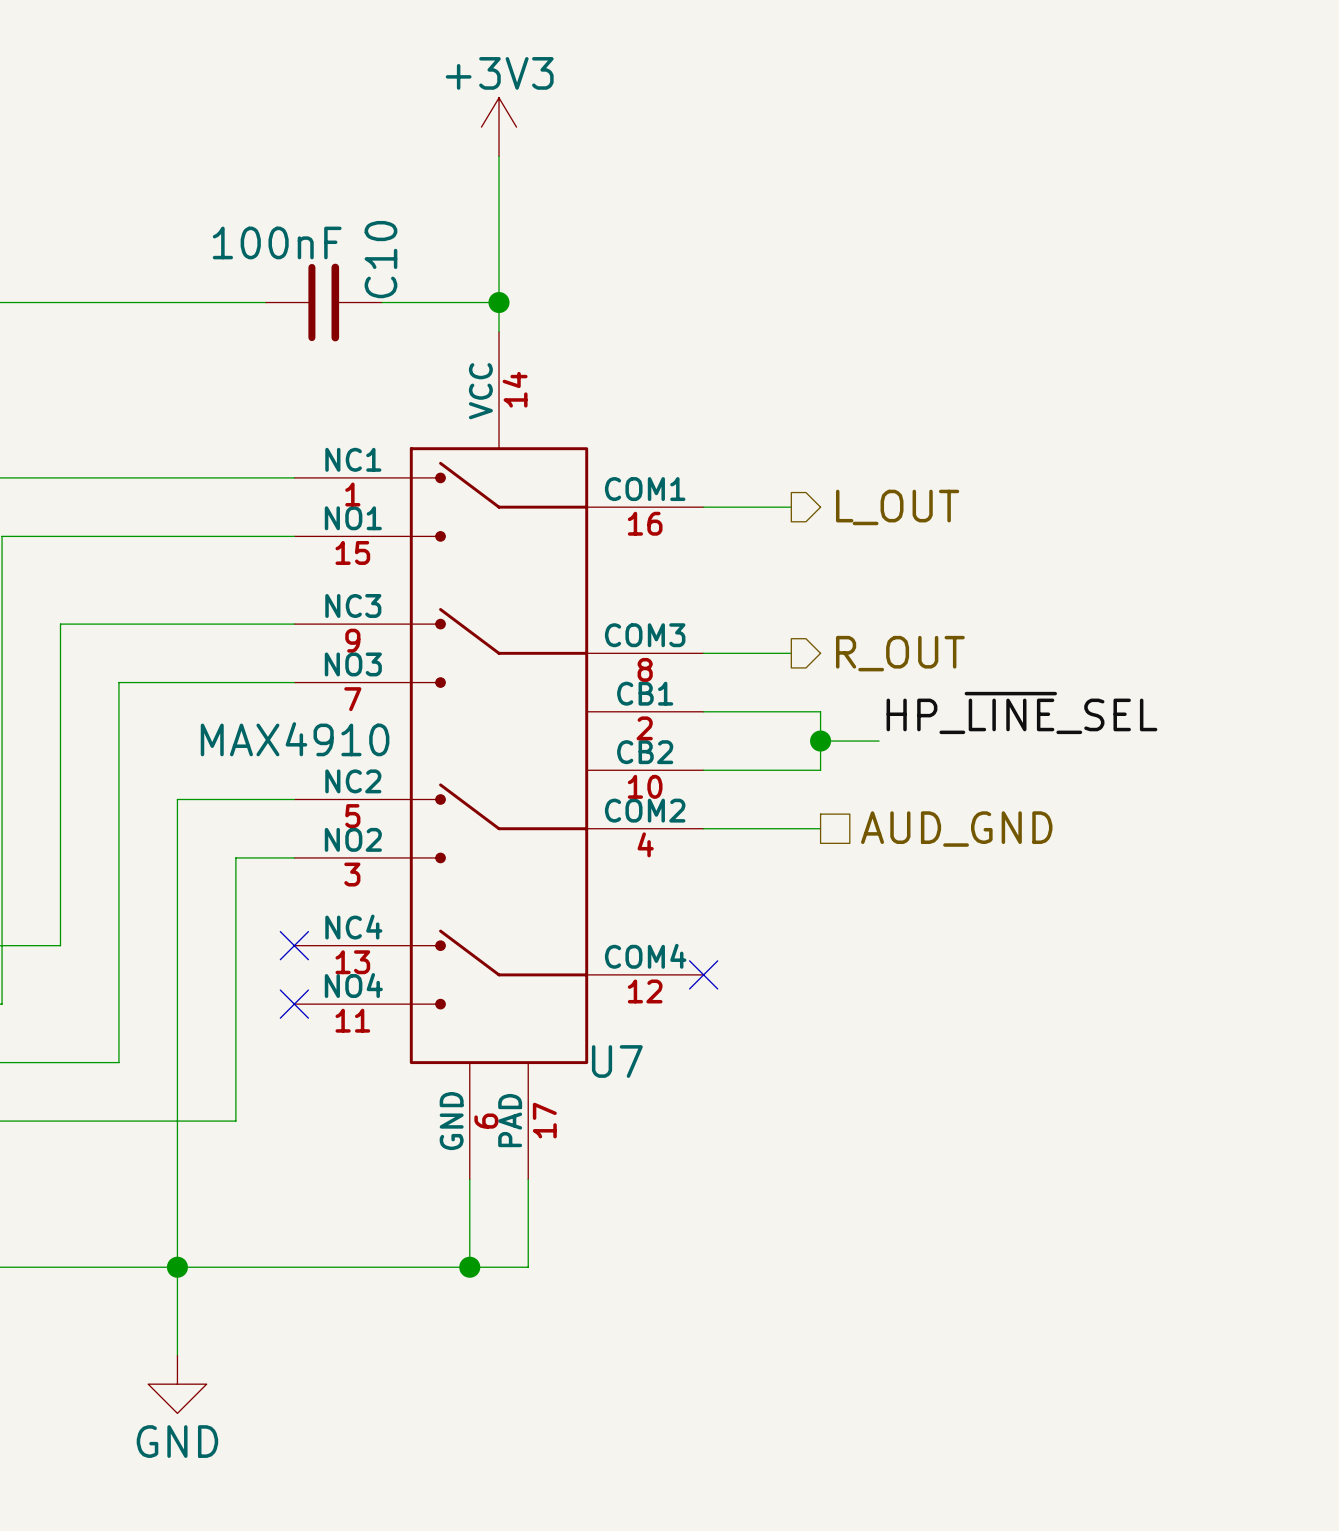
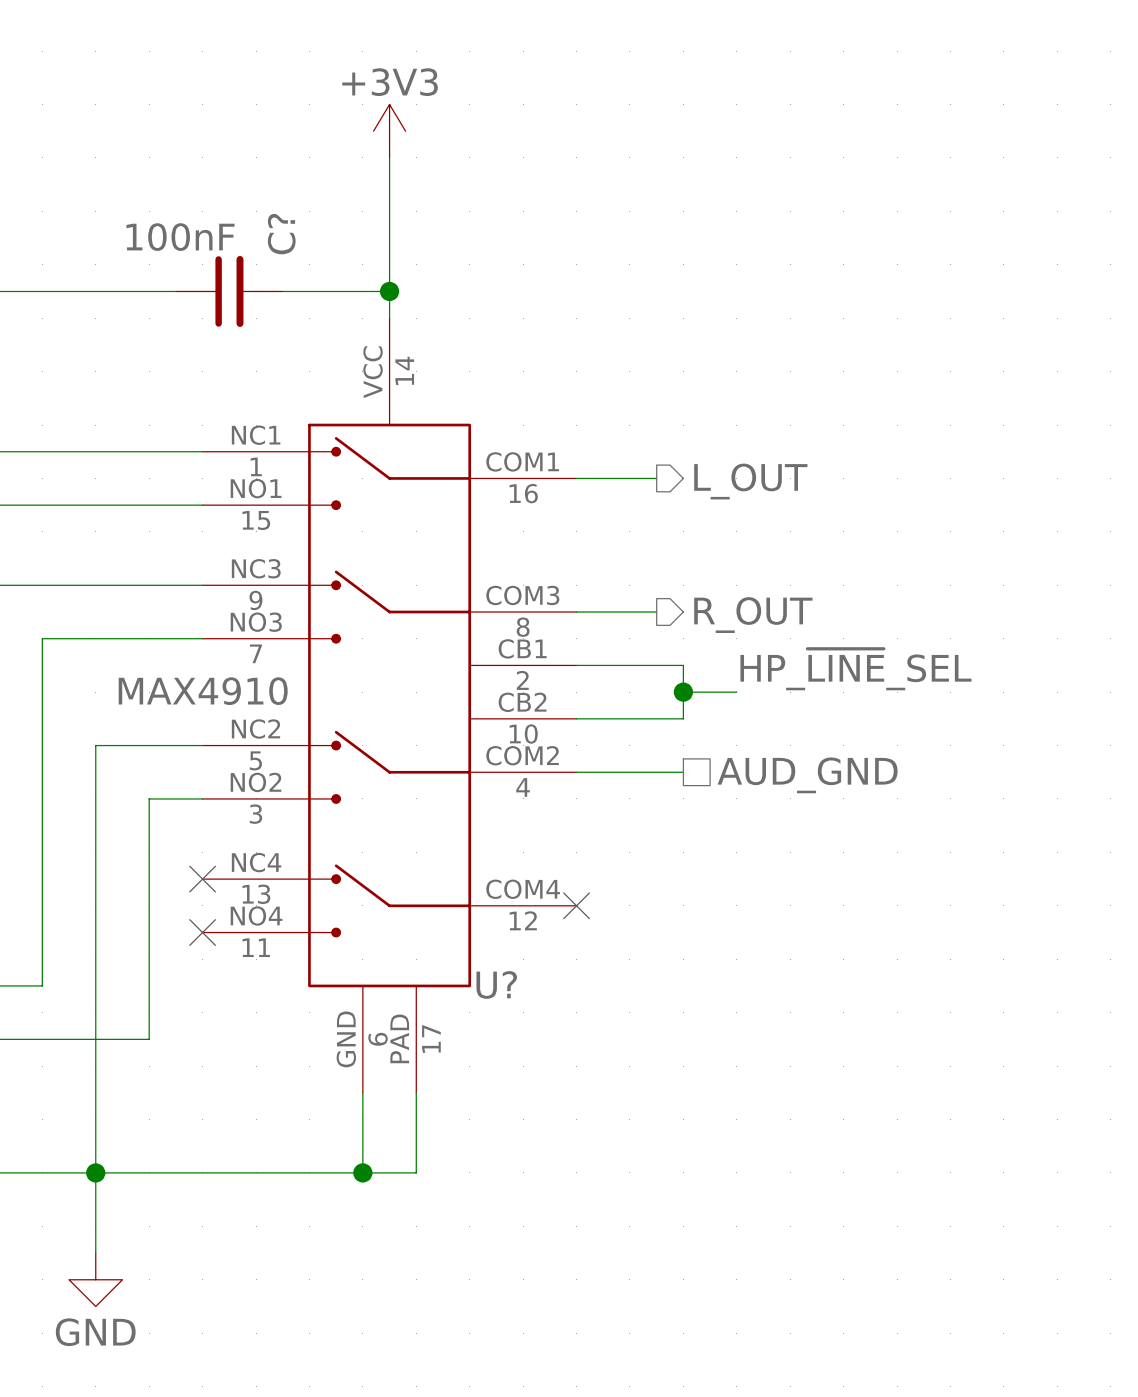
C10 name: C10 (380, 259) -> C? (281, 234)
U7 name: U7 (617, 1061) -> U? (496, 984)

